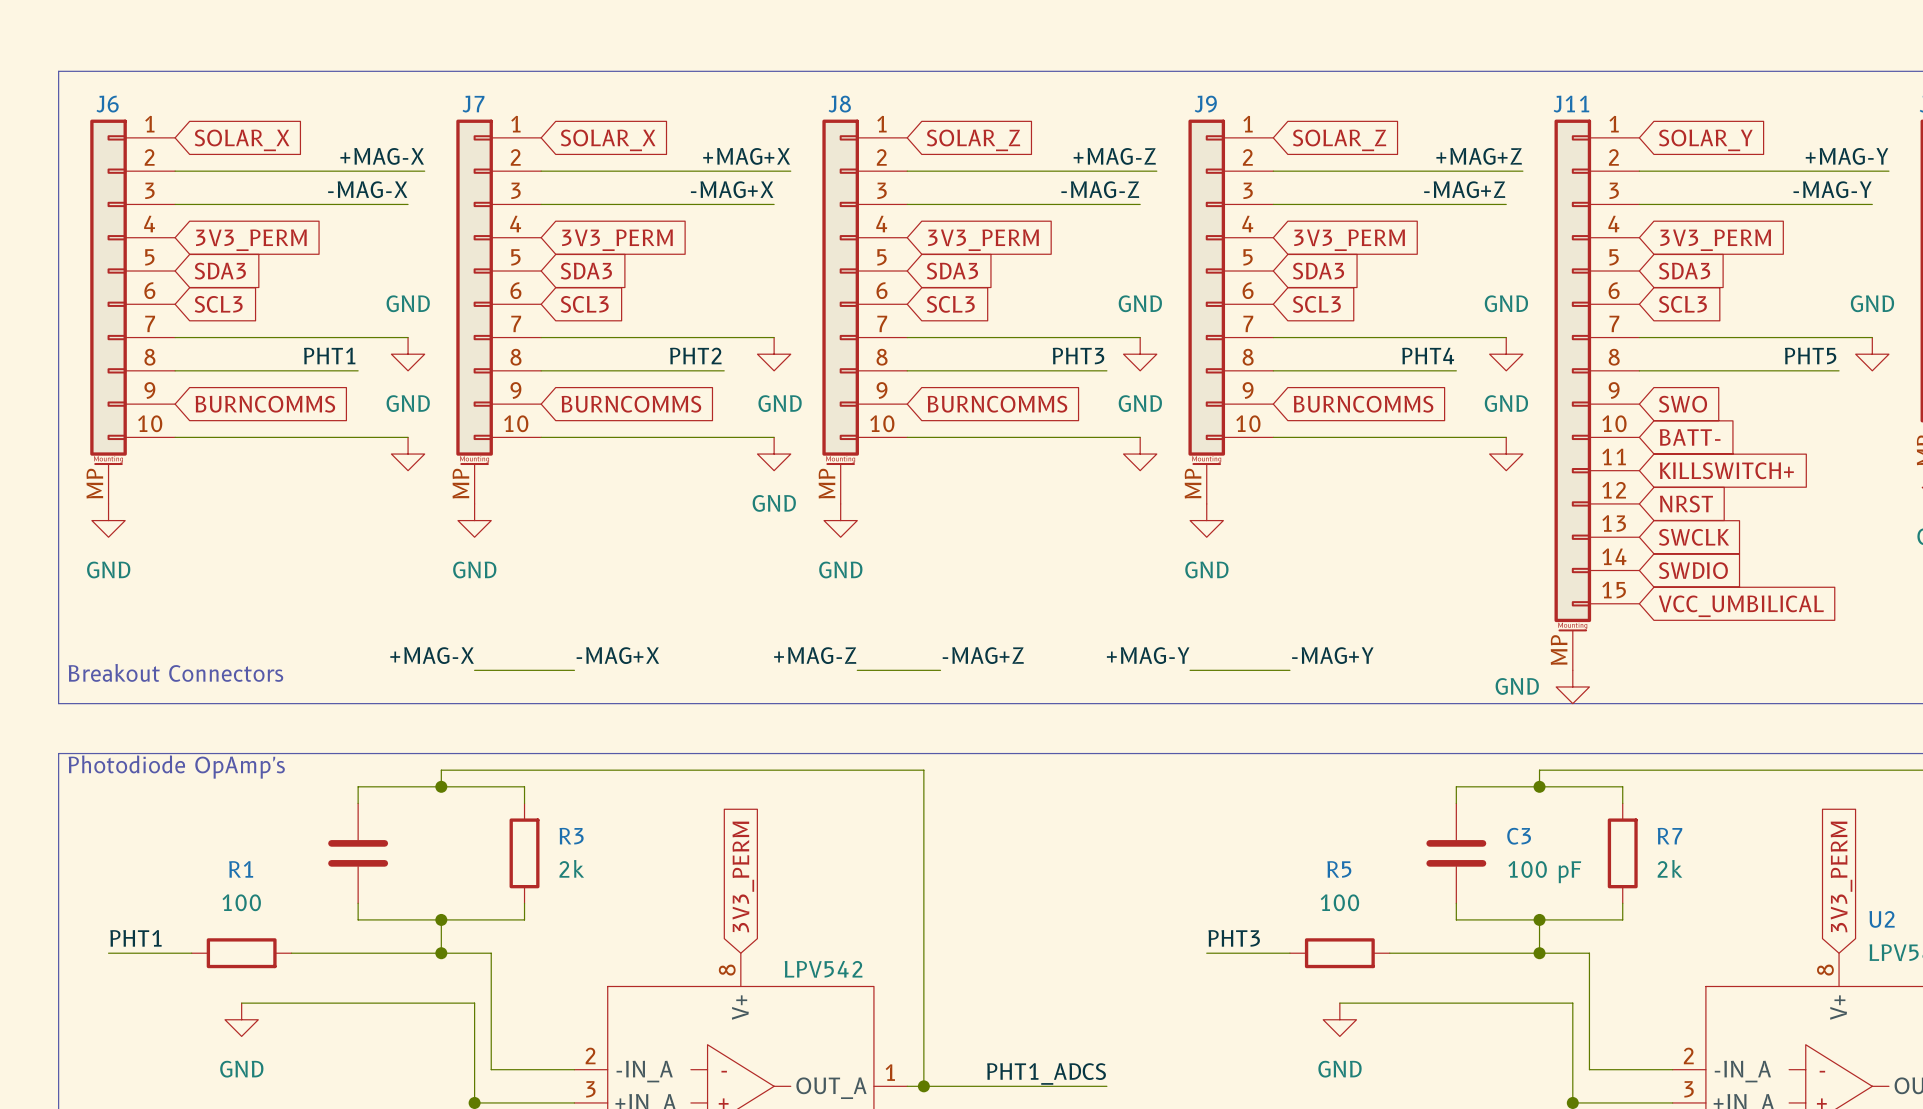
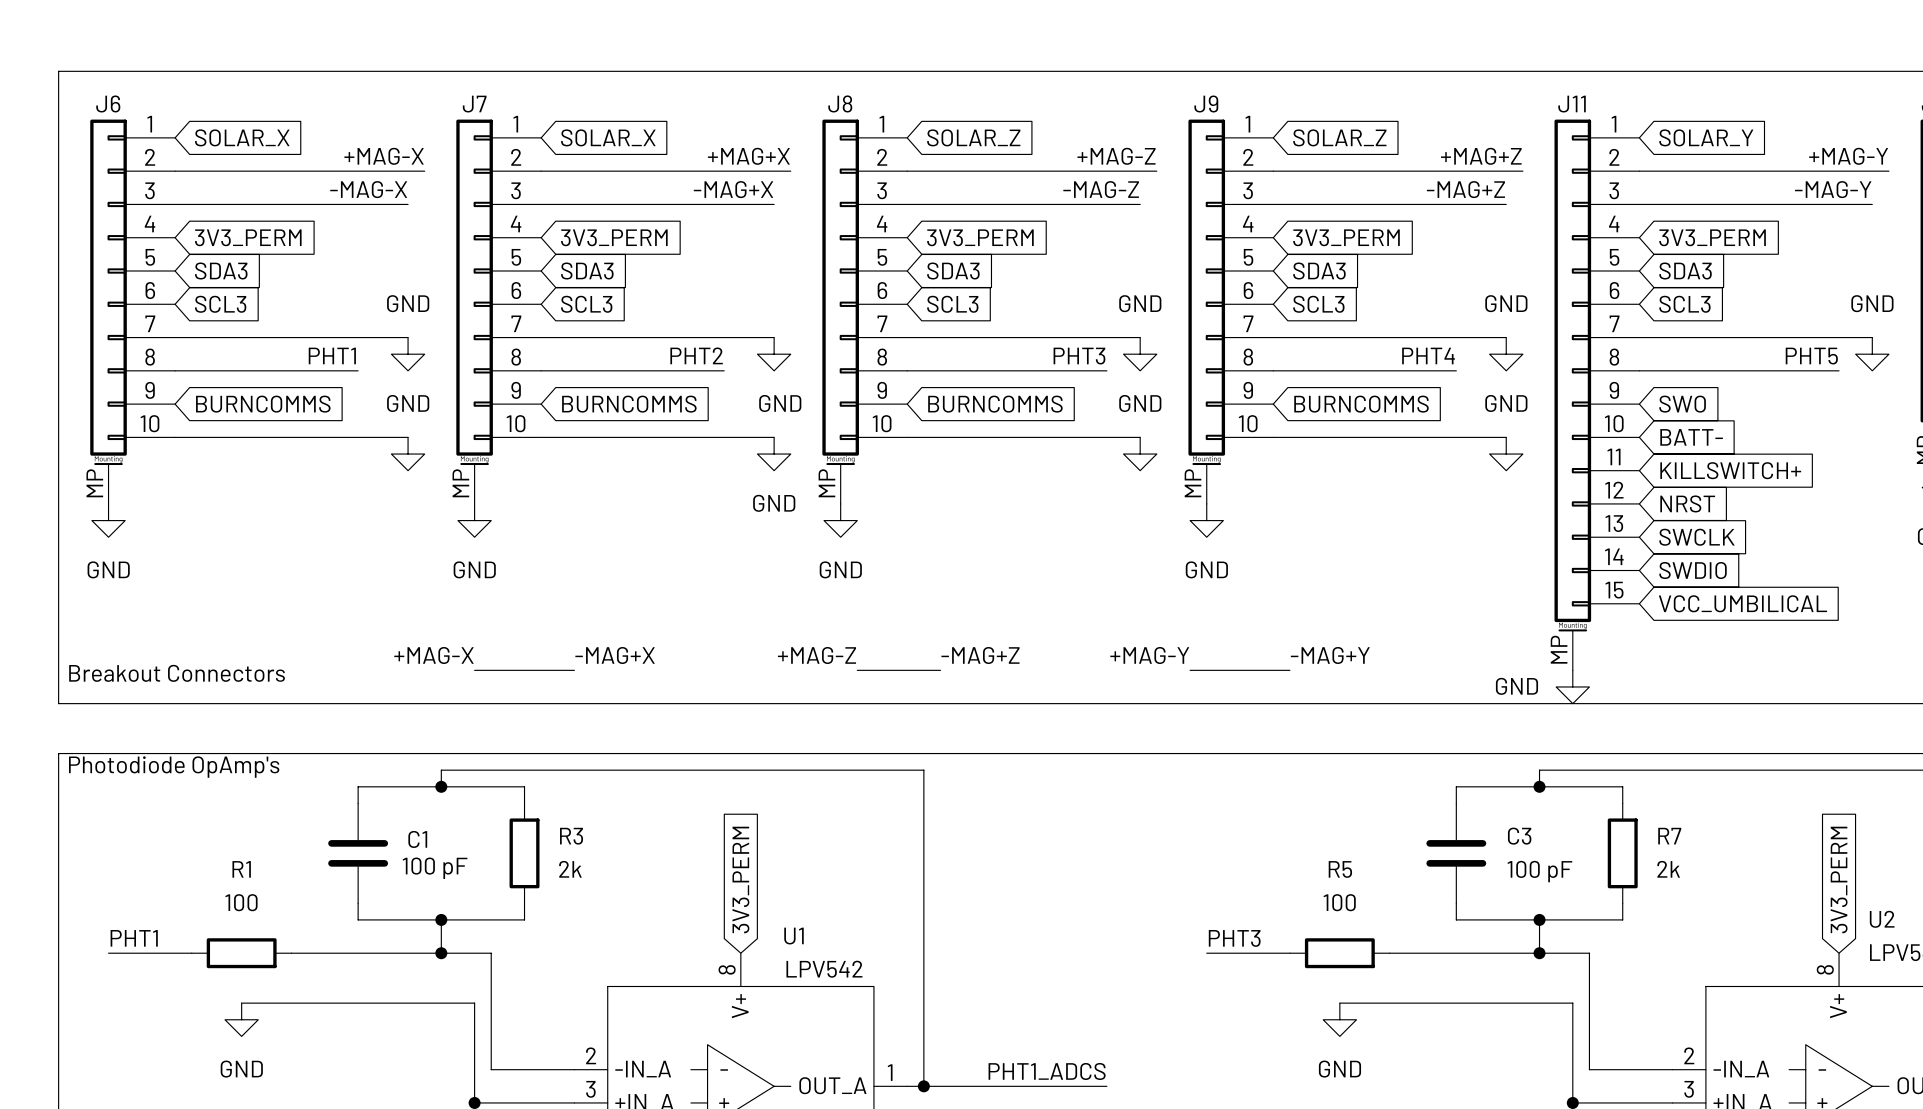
C1 name: none -> C1 (417, 839)
C1 value: none -> 100 pF (435, 868)
U1 name: none -> U1 (794, 936)

